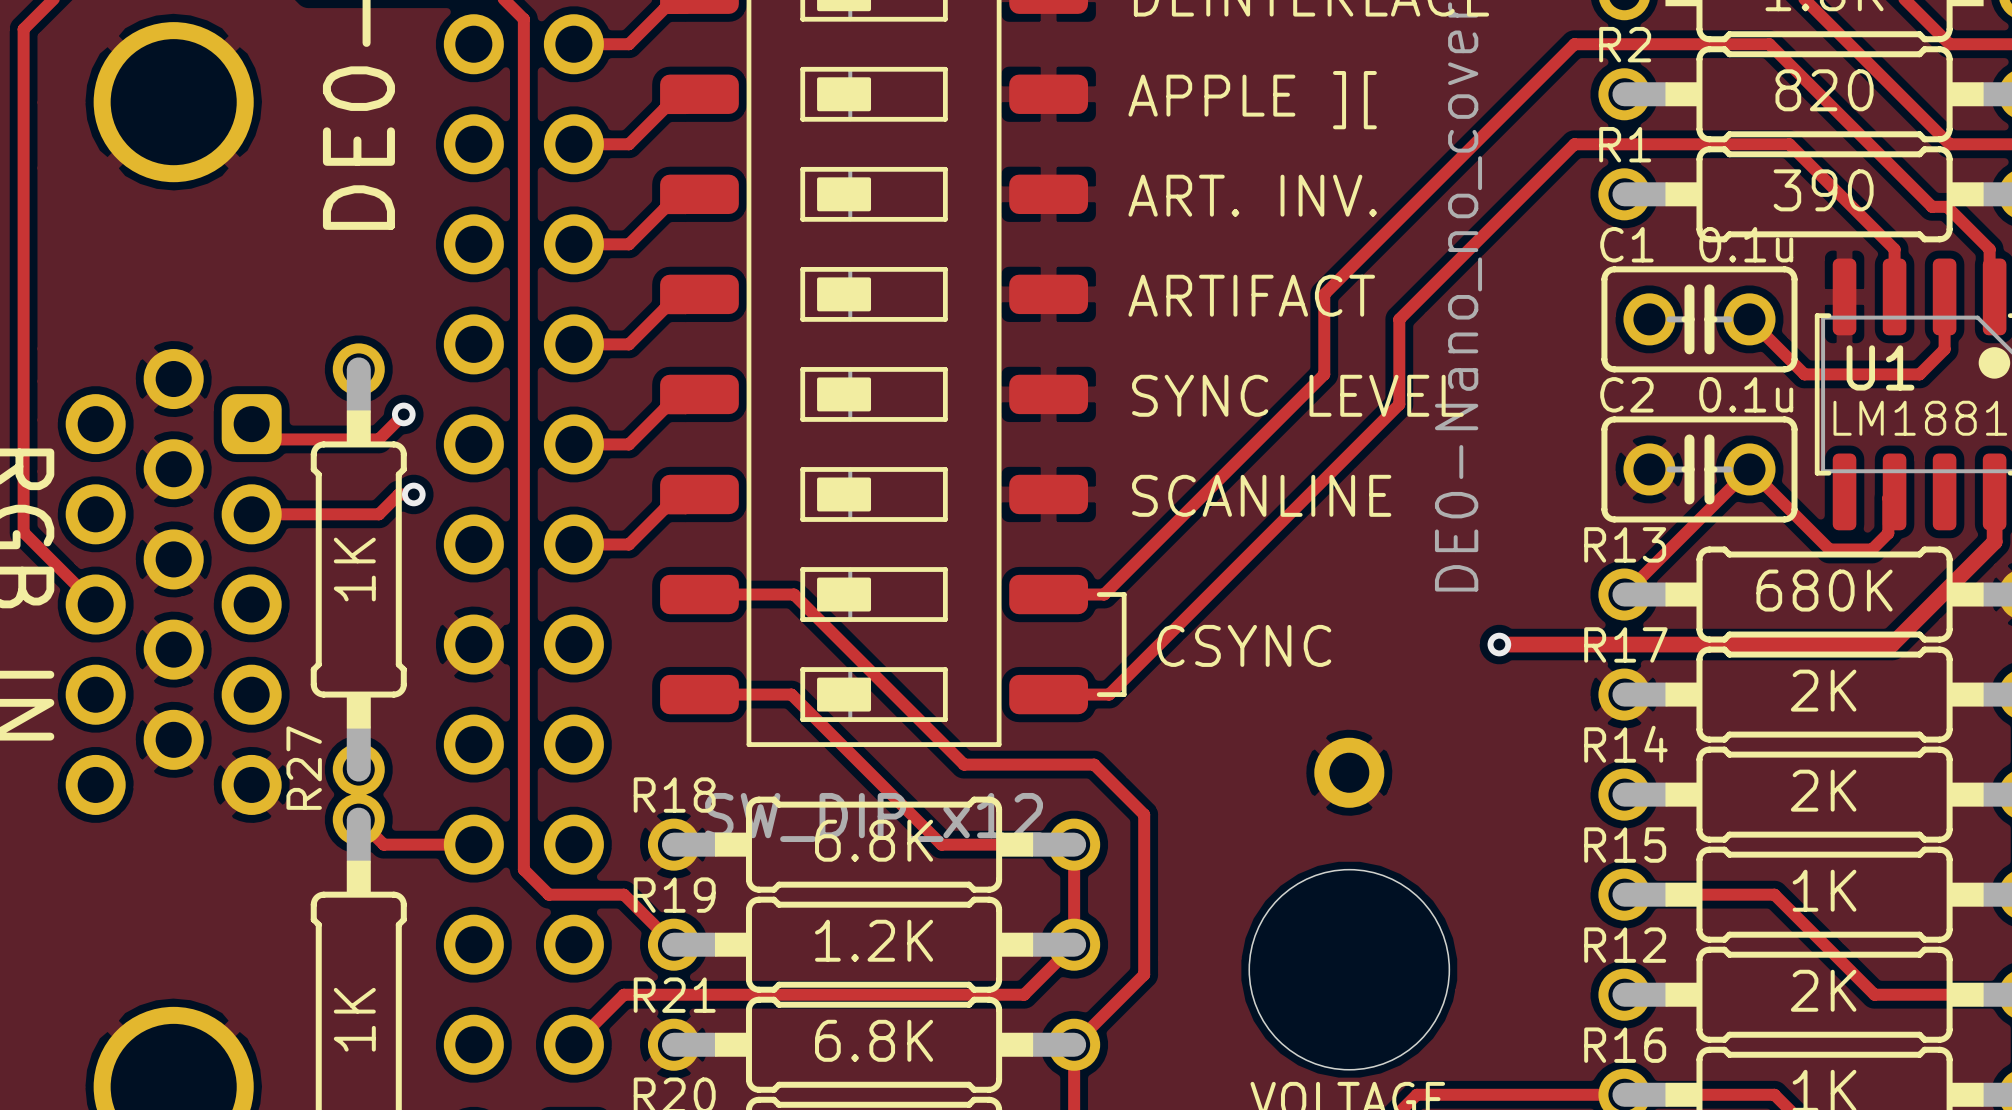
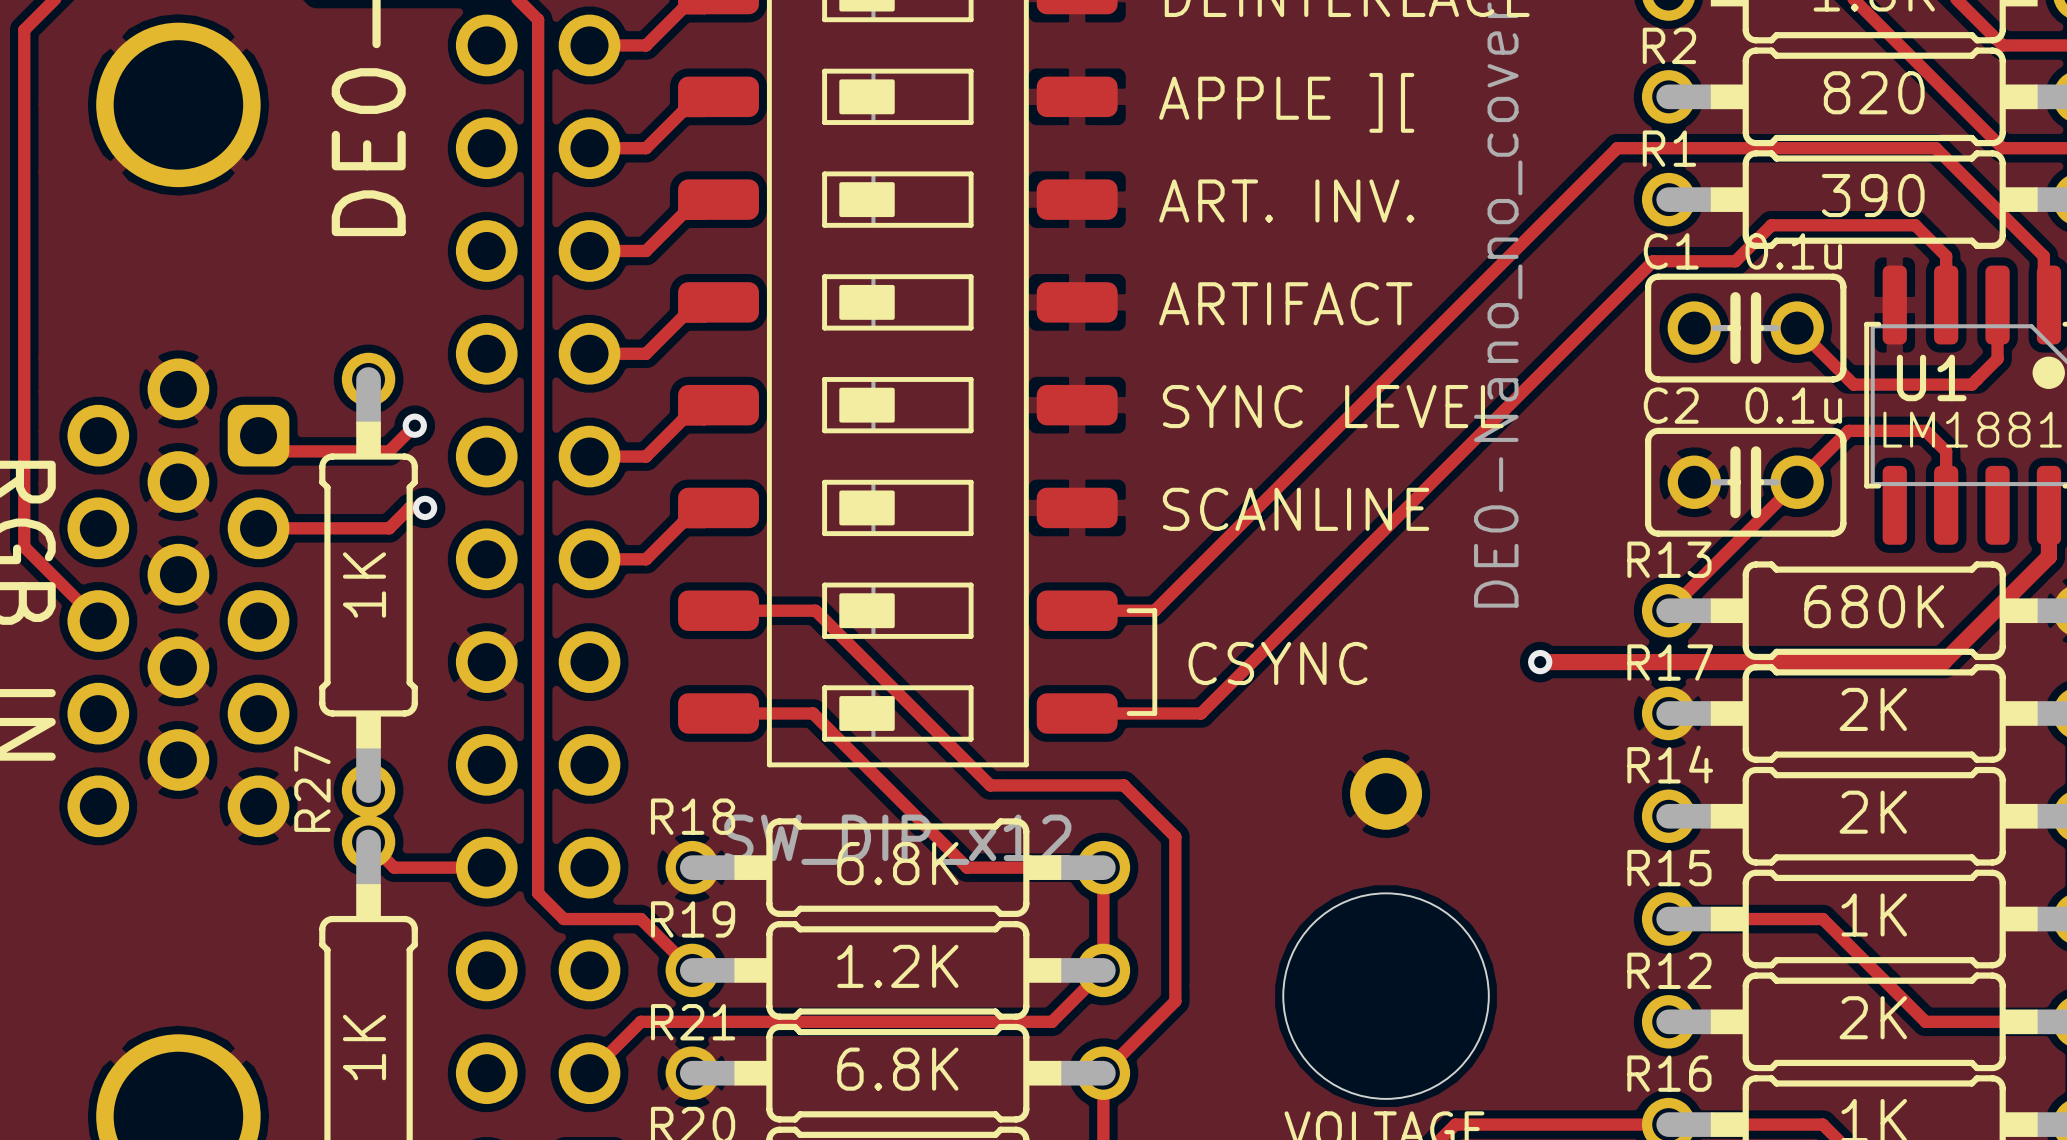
track: (1789, 144) (1864, 219) -> (1838, 148) (1935, 148) (2000, 212)
track: (1947, 206) (1932, 206) (1769, 44) (1574, 44) (1324, 294) (1324, 374) (1104, 594) -> none
track: none -> (1915, 225) (1771, 225) (1735, 261) (1653, 261) (1201, 713) (1139, 713)
track: (1399, 319) (1399, 404) (1109, 694) -> (1437, 328) (1154, 610) (1134, 610)
track: (1749, 469) (1829, 549) (1872, 549) (1888, 533) (1888, 498) (1894, 491) -> (1797, 482) (1848, 430) (1925, 430) (1946, 451) (1946, 505)

